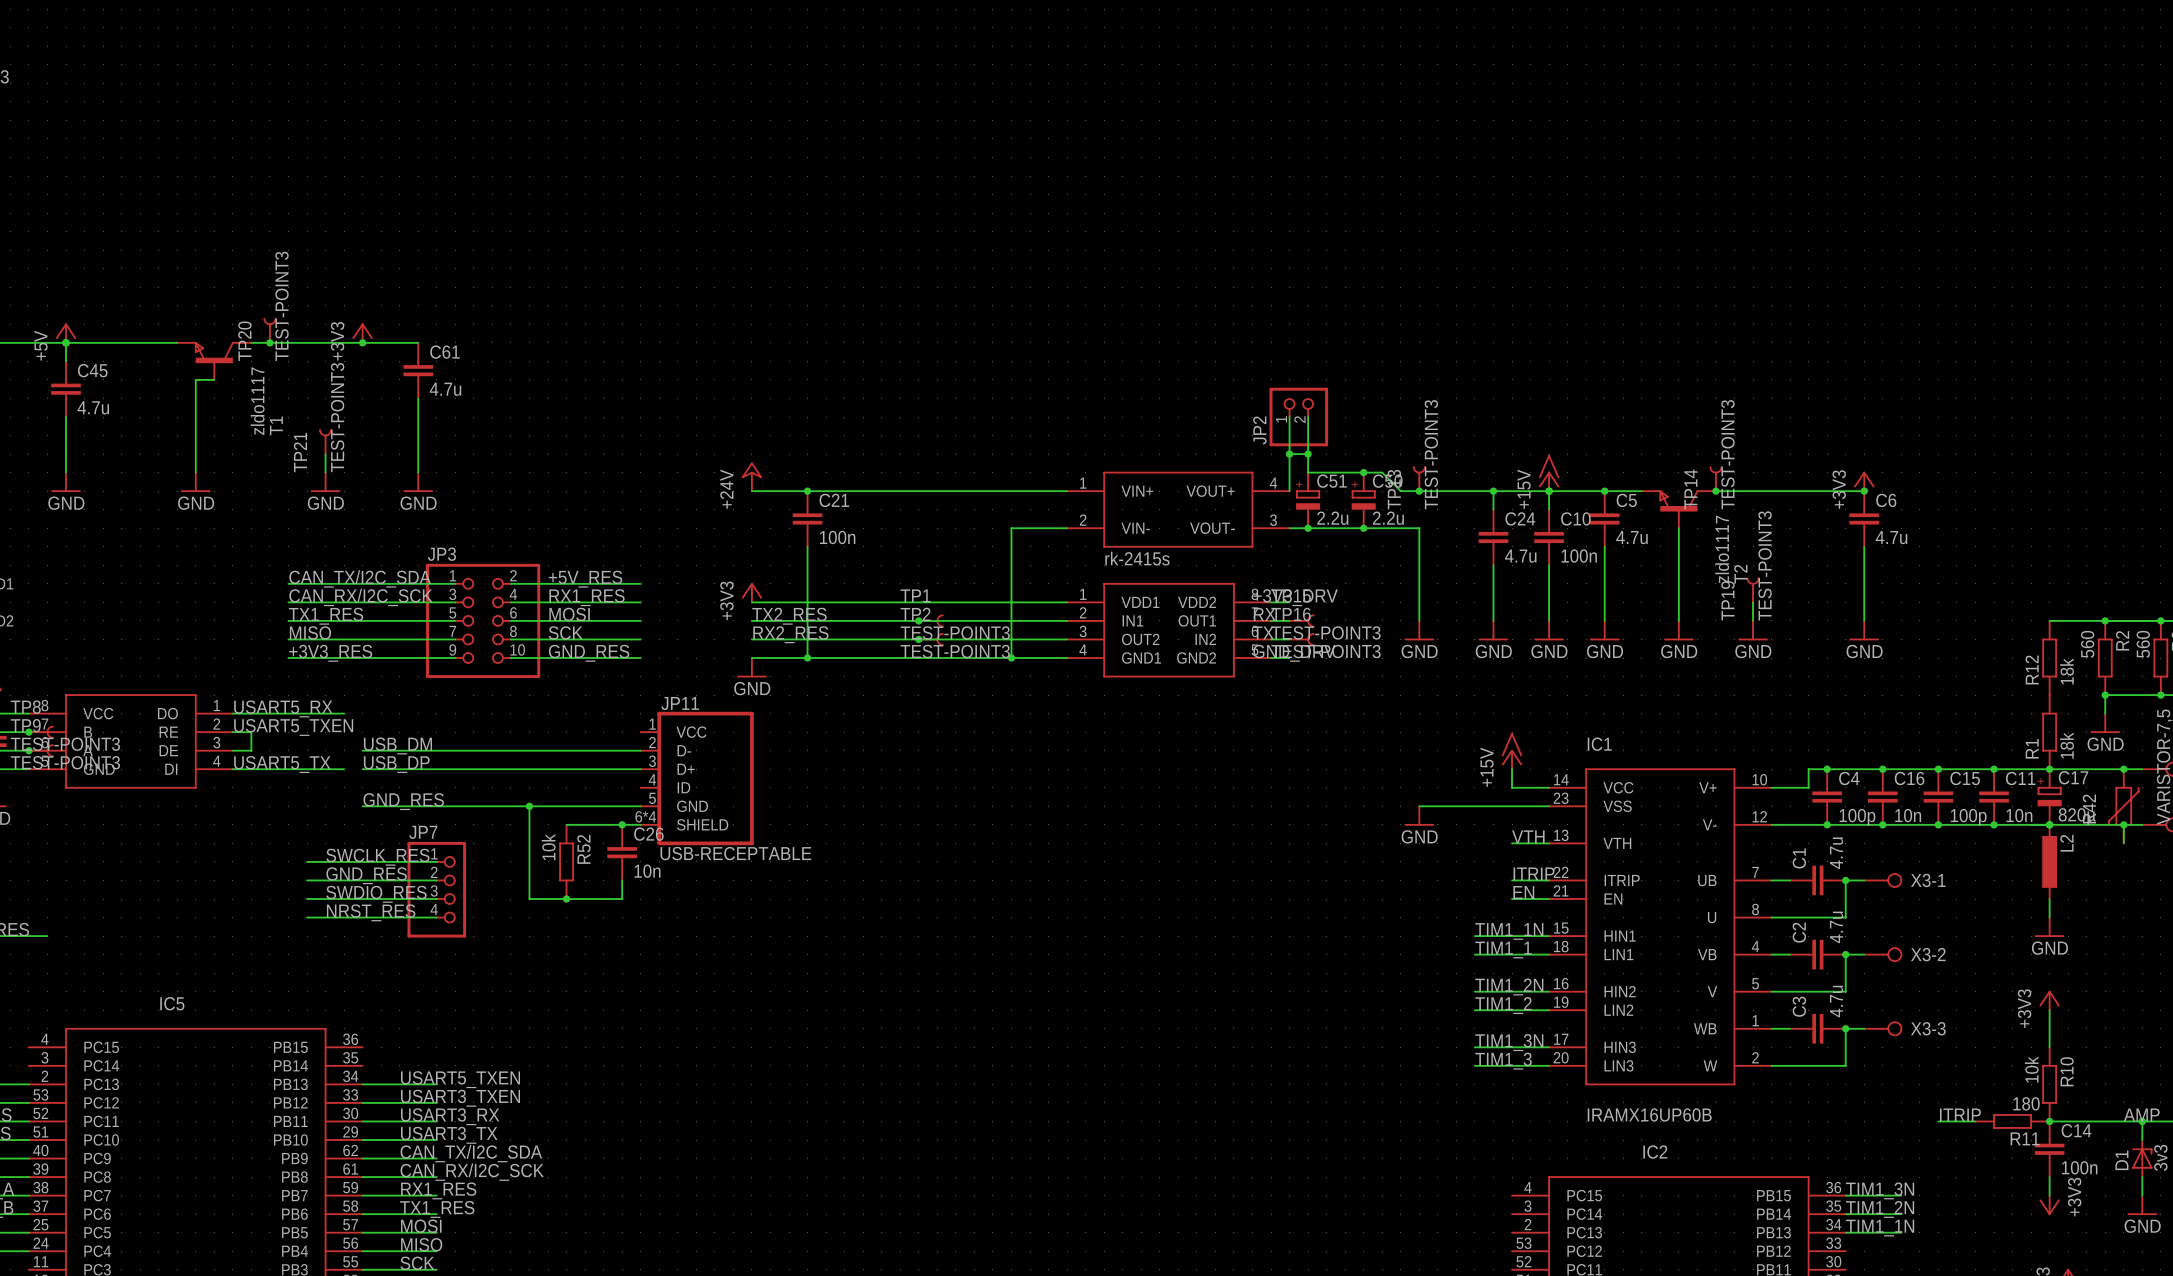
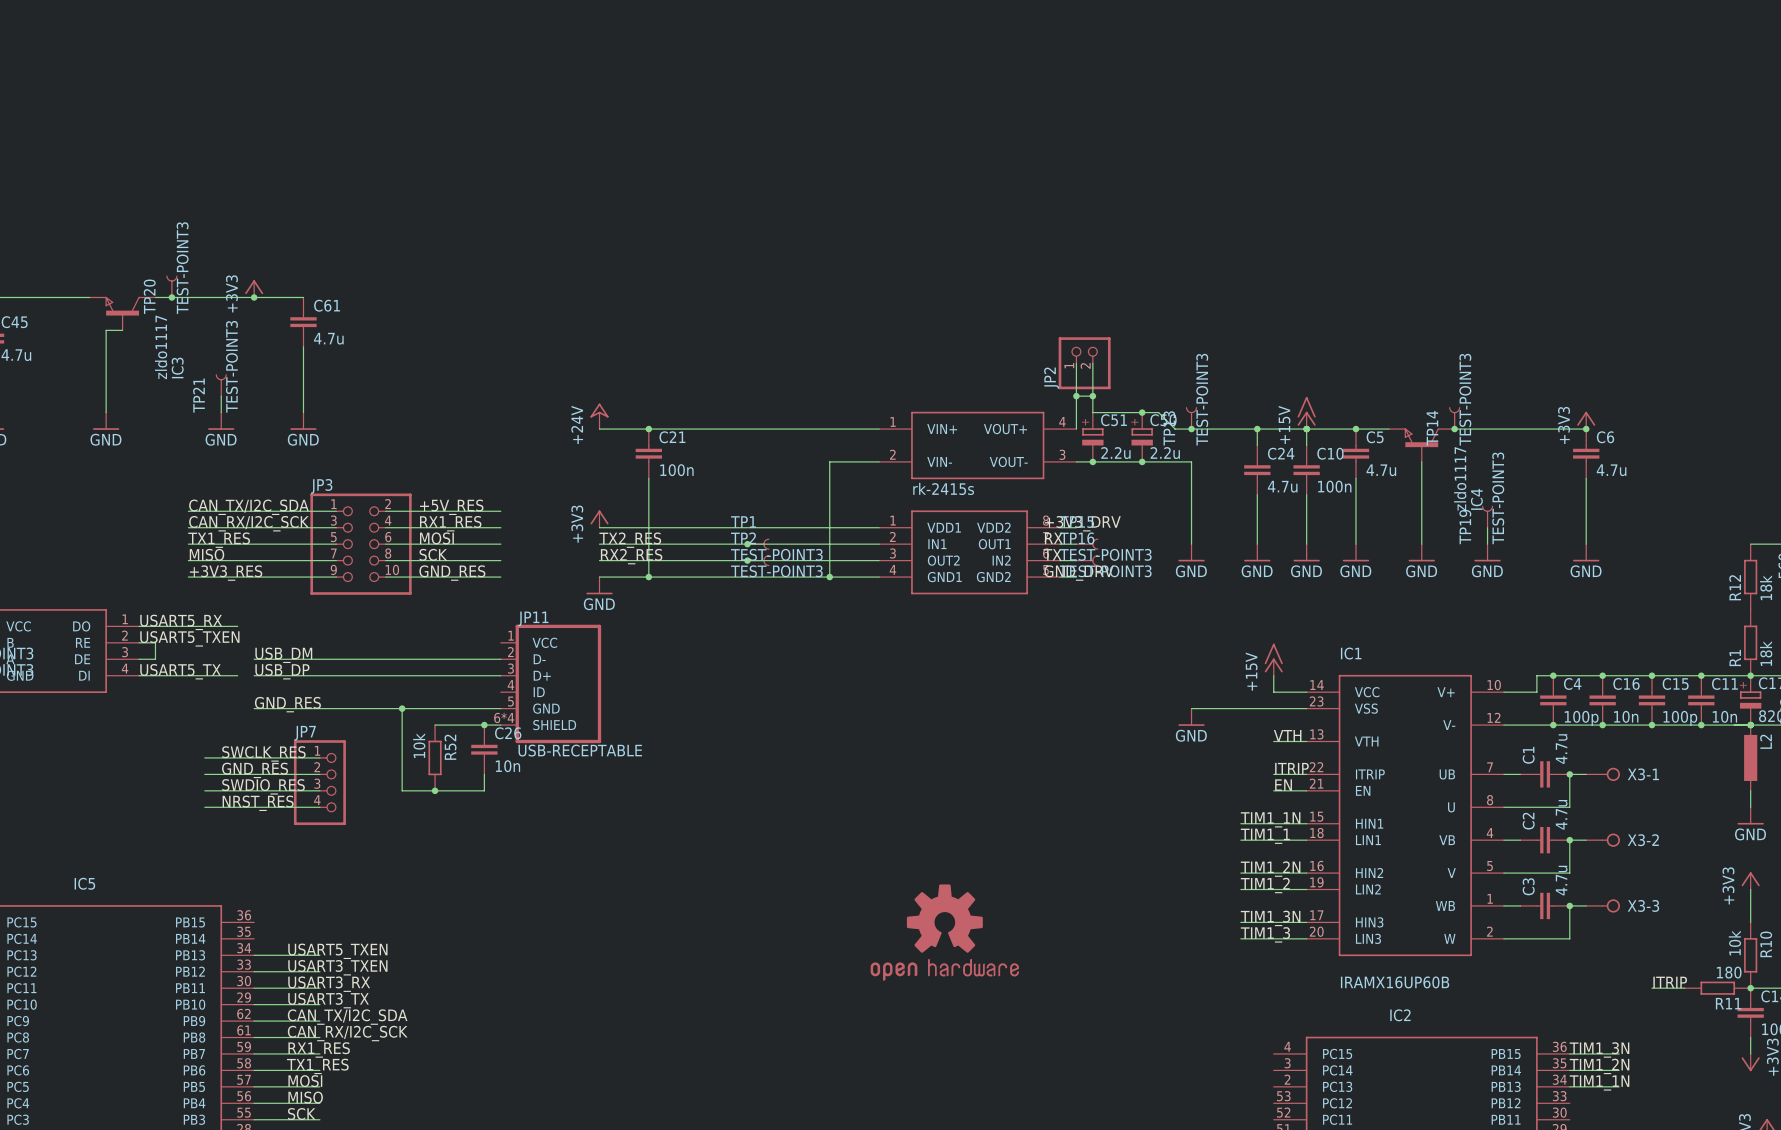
T1 name: T1 (276, 425) -> IC3 (177, 368)
T2 name: T2 (1740, 574) -> IC4 (1476, 499)
part: none -> (944, 932)

